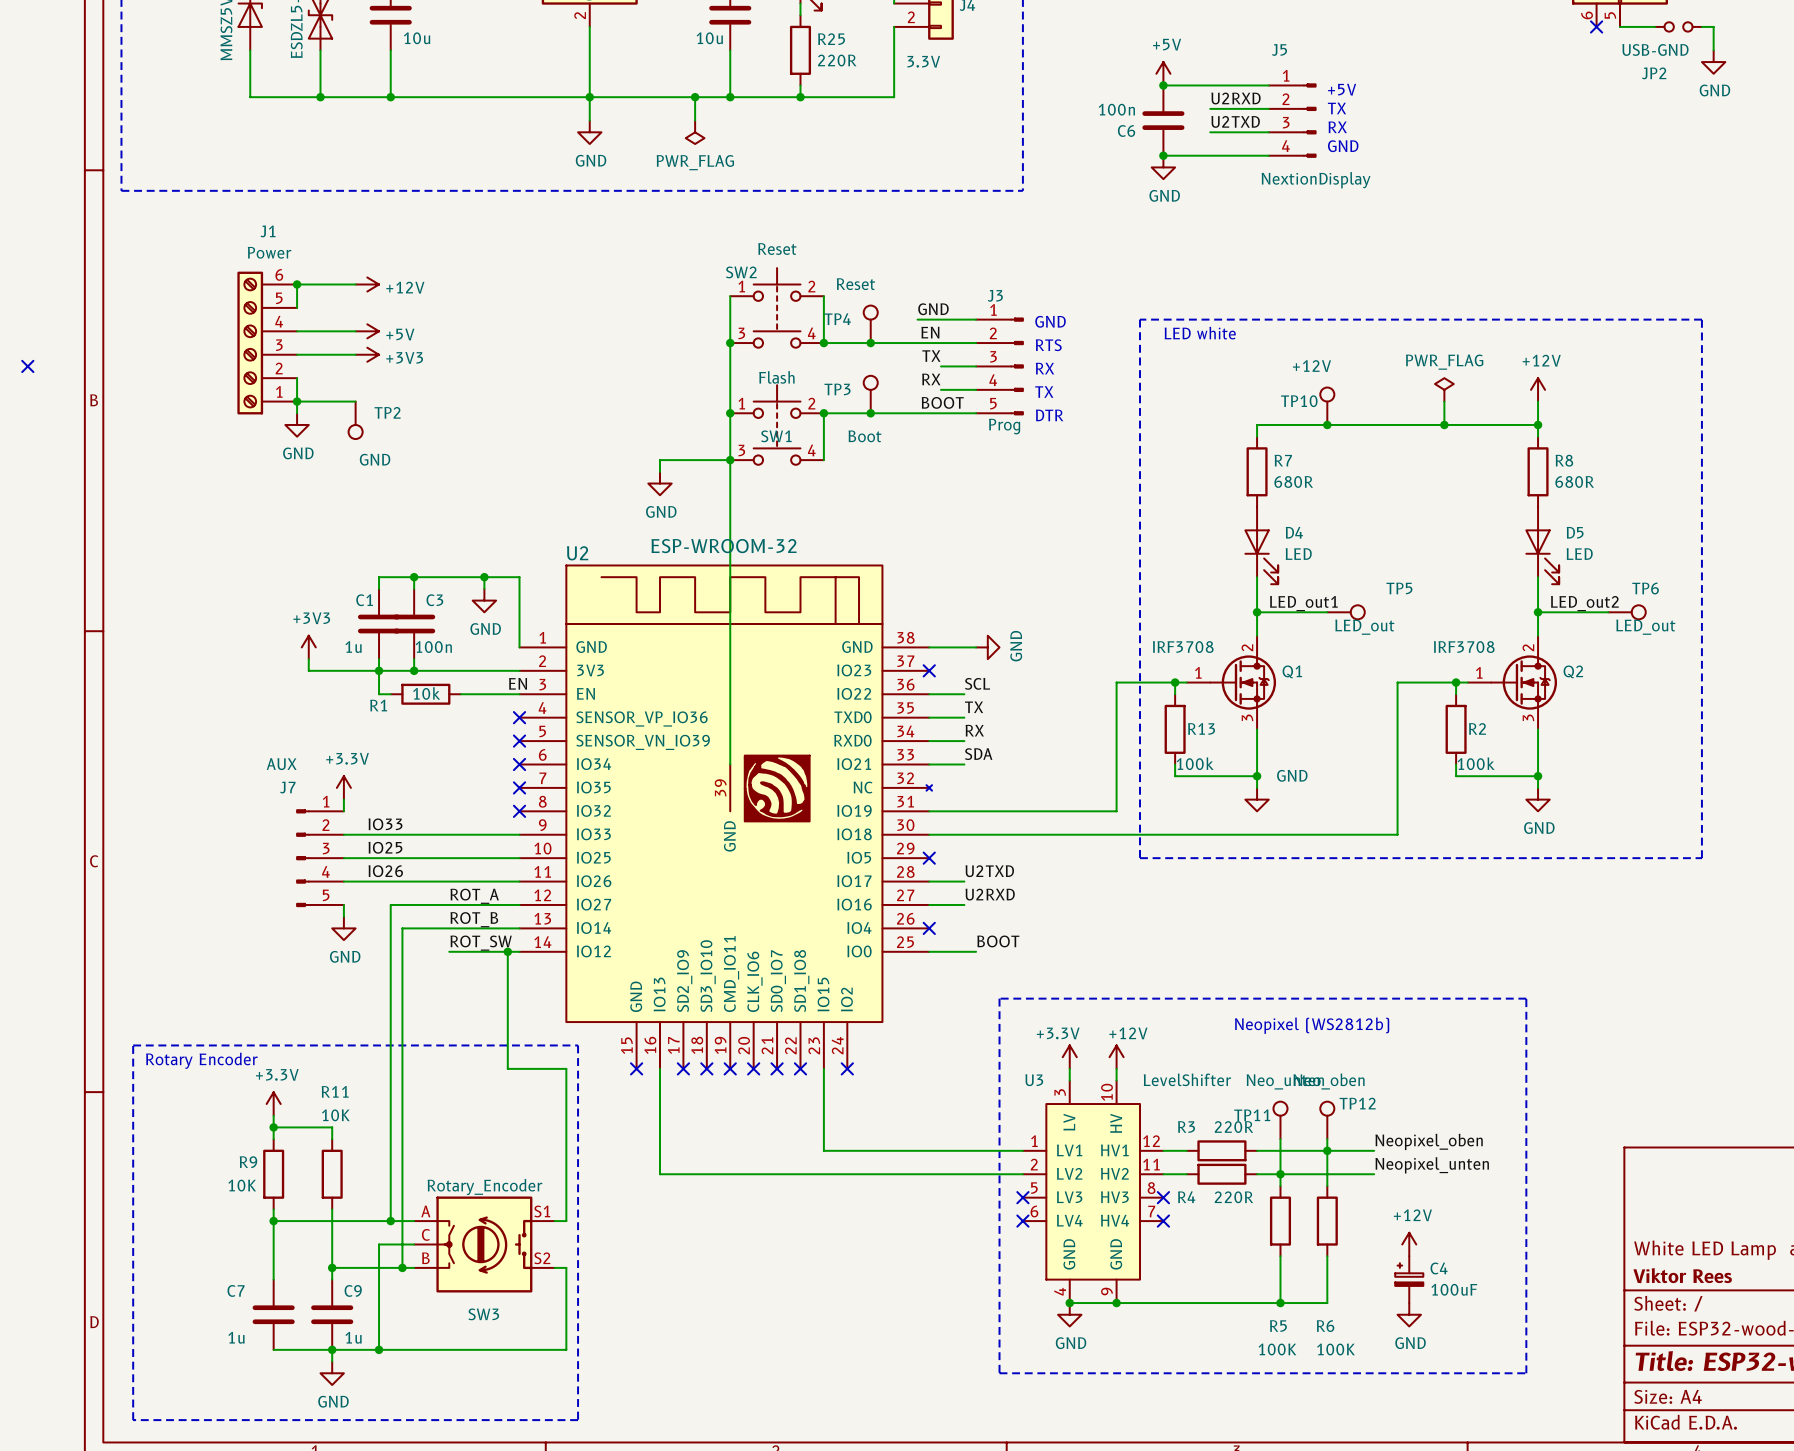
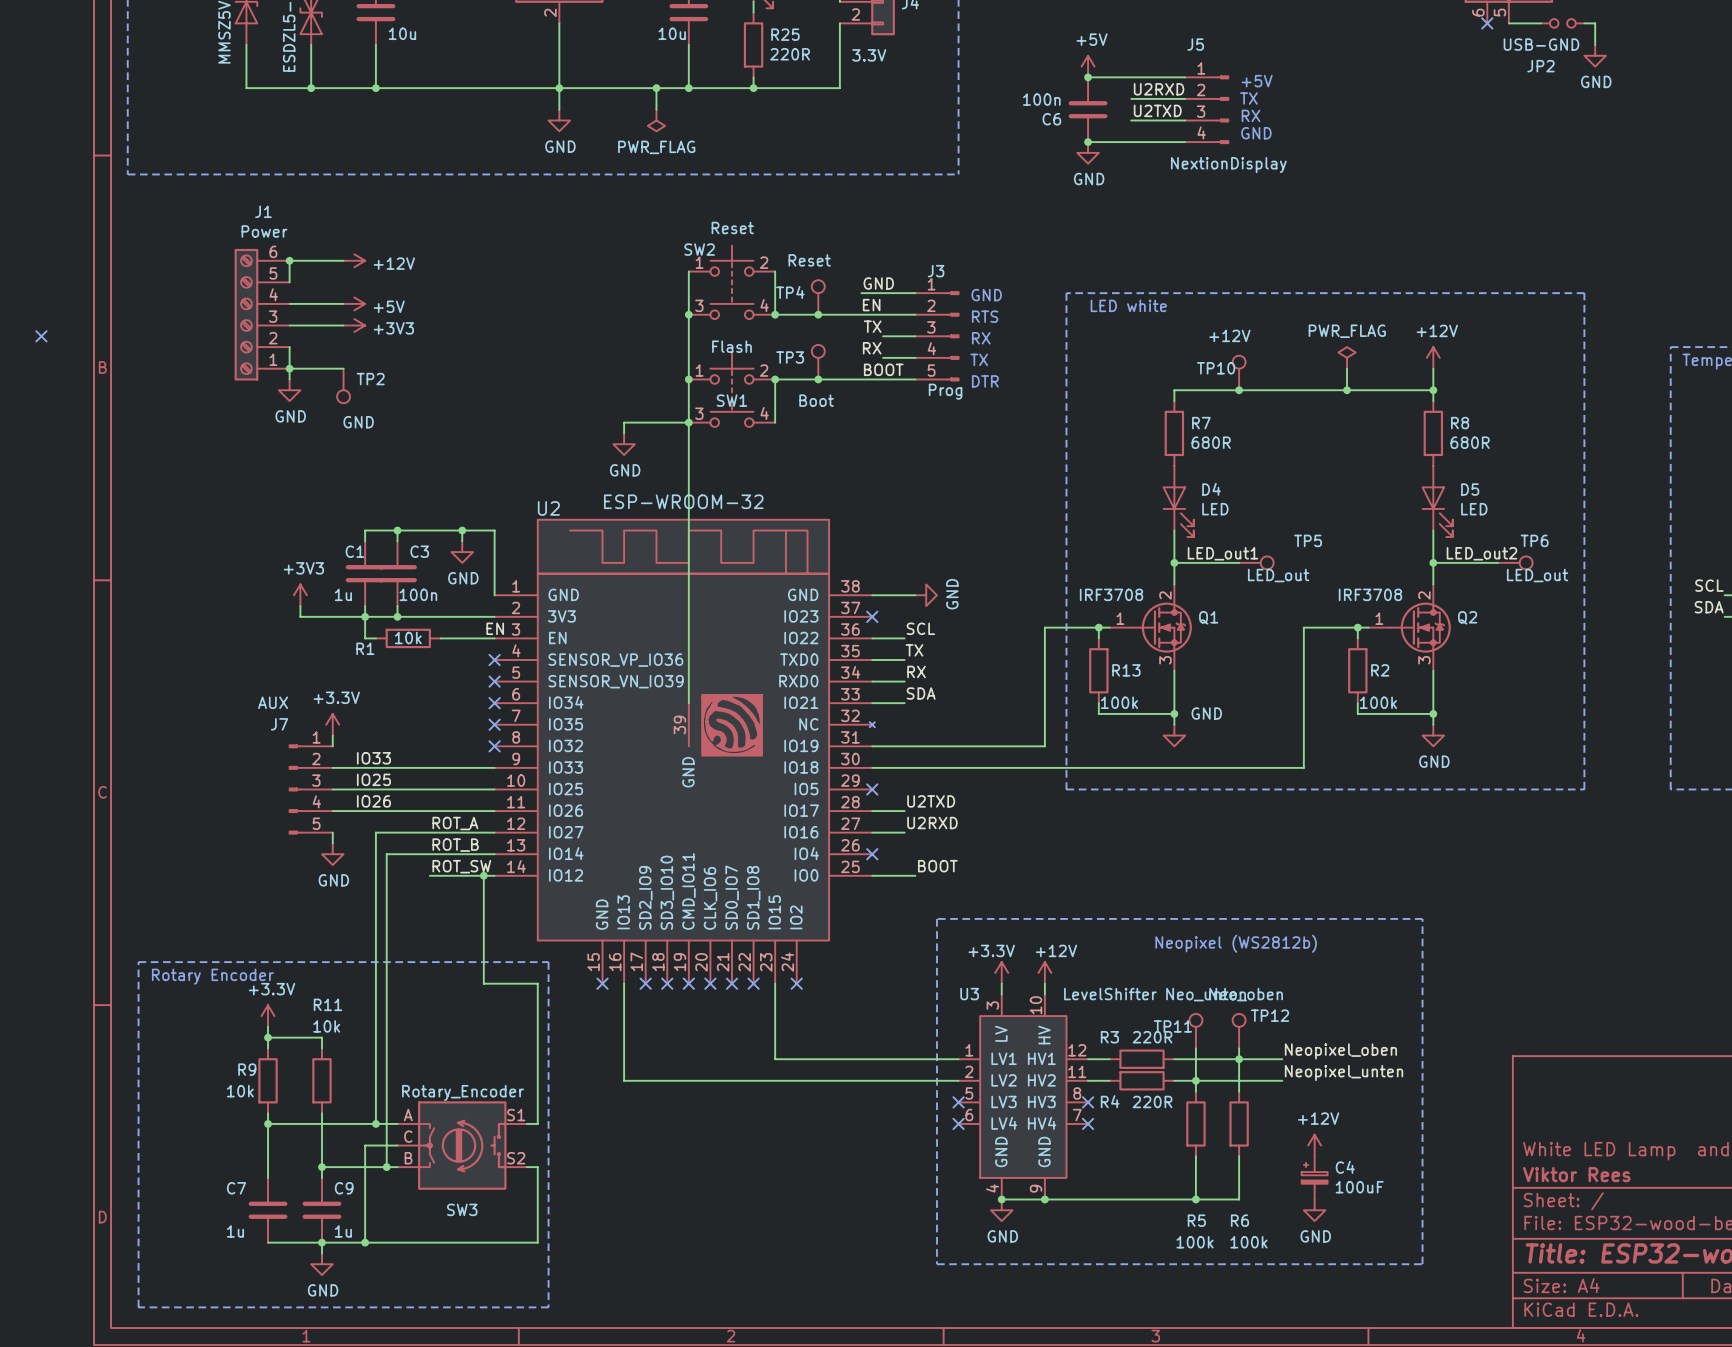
R11 value: 10K (335, 1115) -> 10k (326, 1026)
R9 value: 10K (242, 1185) -> 10k (240, 1091)
R5 value: 100K (1277, 1349) -> 100k (1195, 1242)
R6 value: 100K (1335, 1349) -> 100k (1248, 1242)

